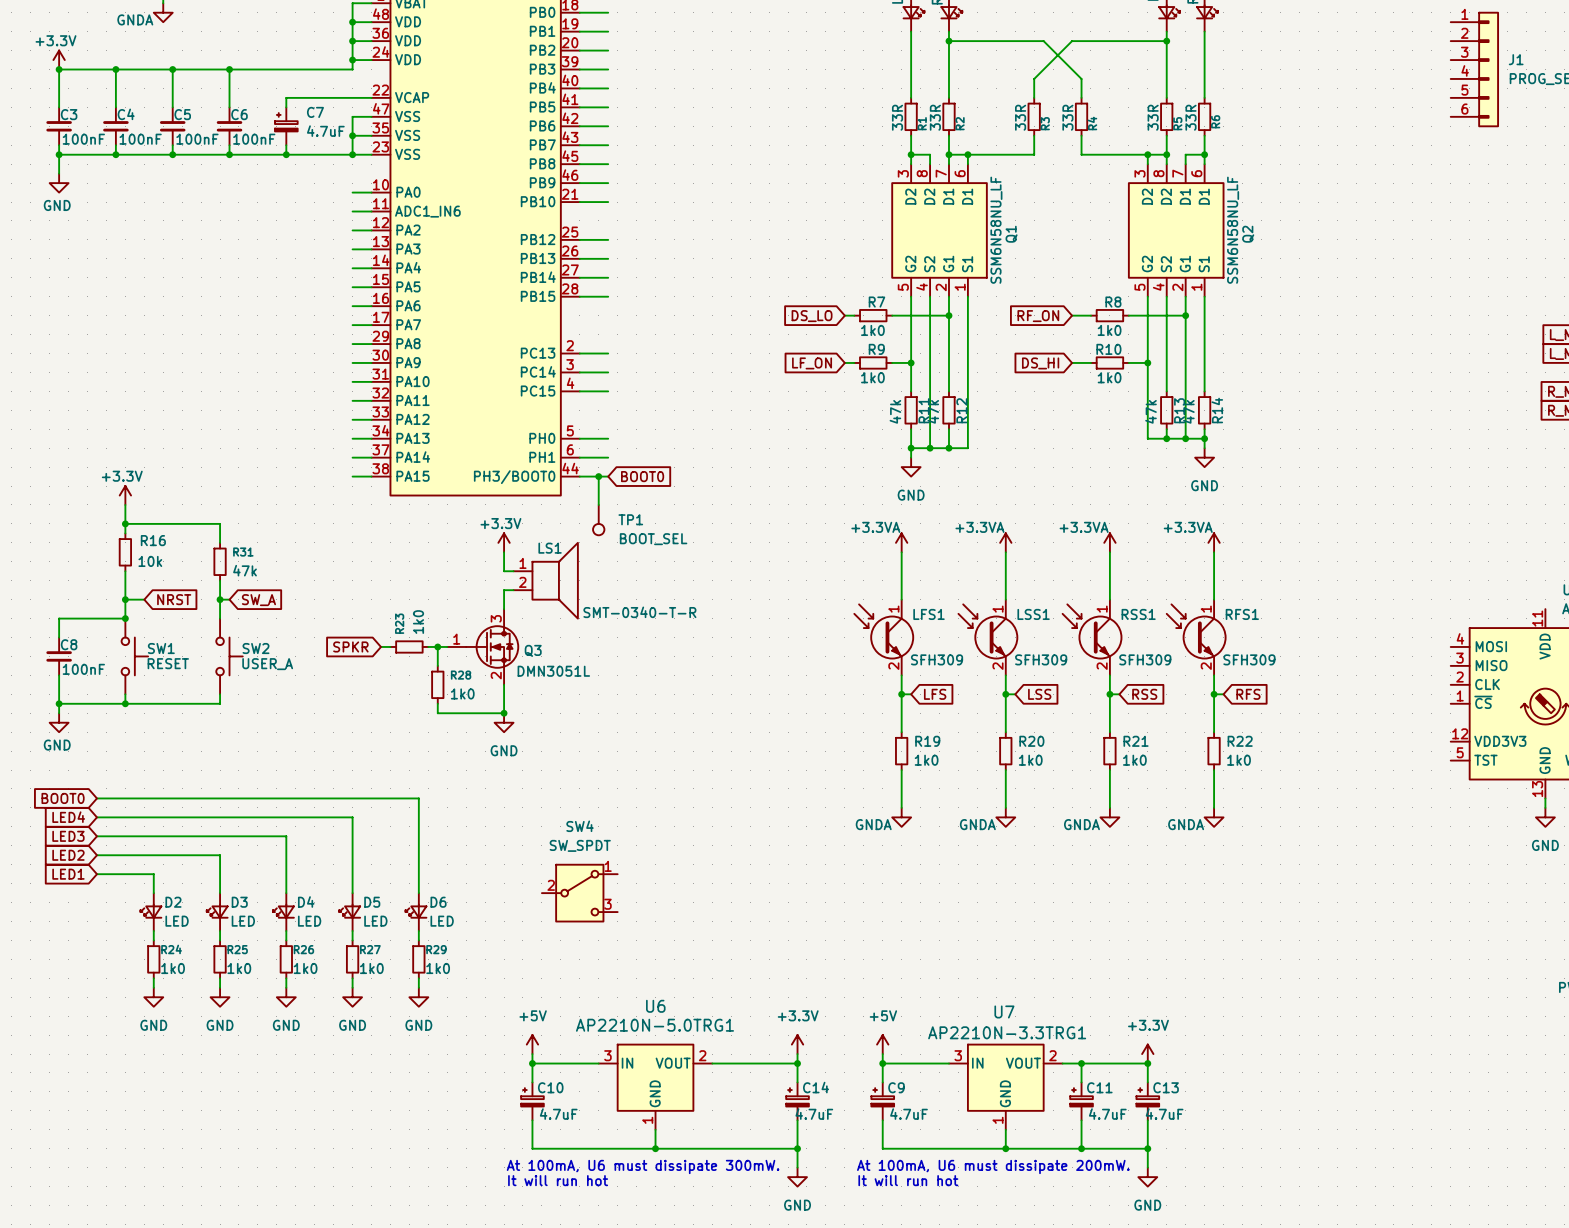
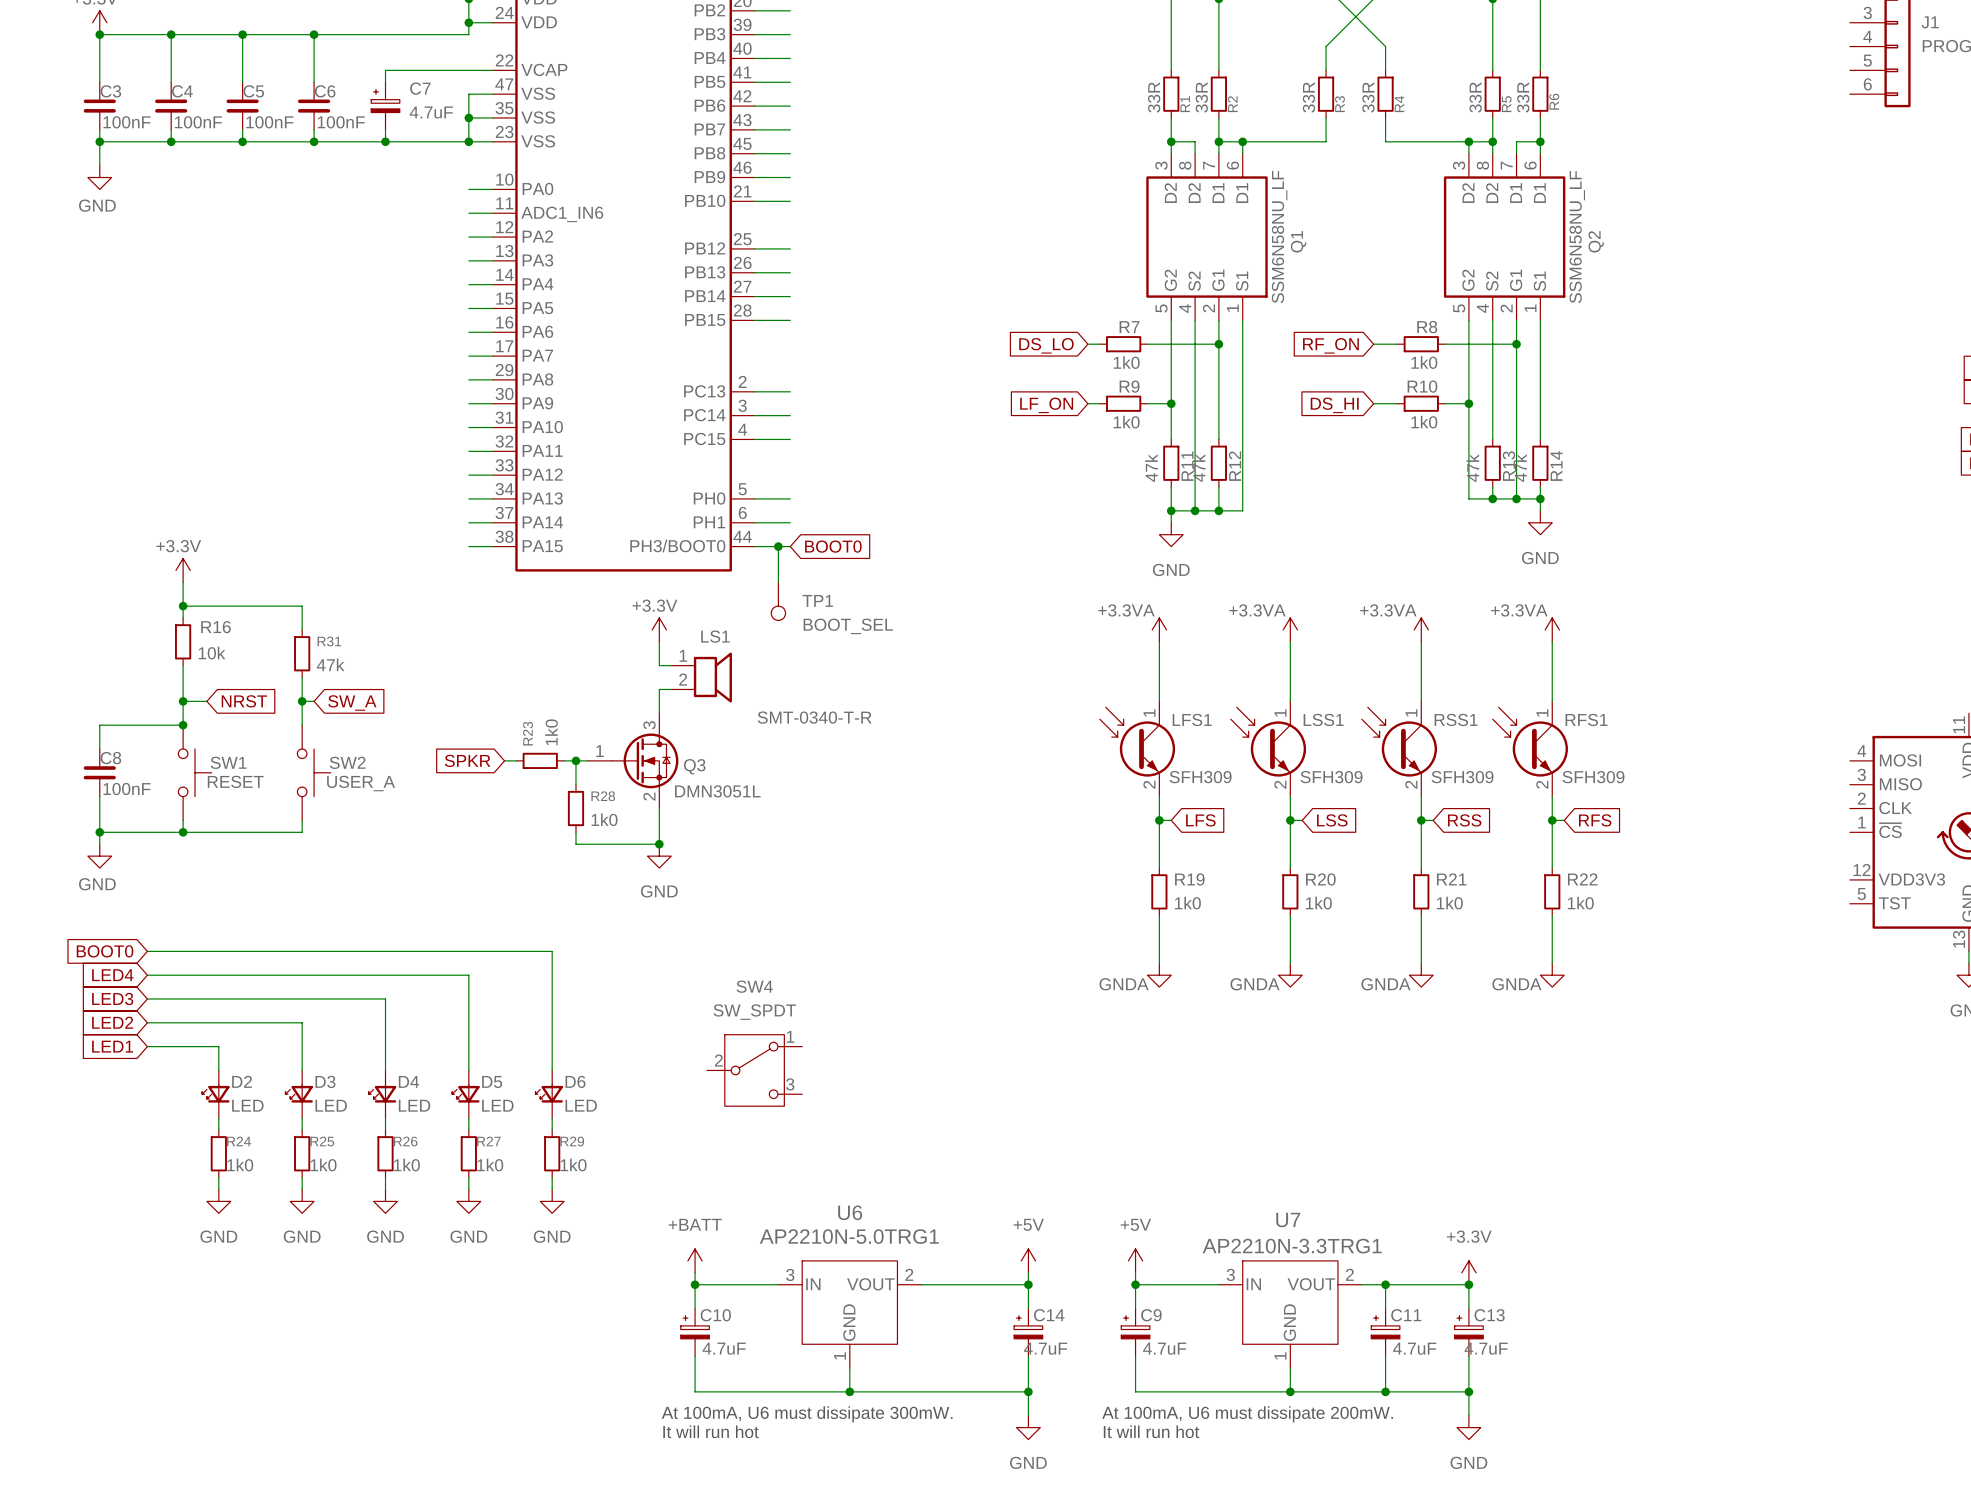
LS1 symbol: [513, 541, 579, 620] -> [671, 652, 732, 703]
power symbol: +5V (532, 1044) -> +BATT (695, 1260)
power symbol: +3.3V (797, 1044) -> +5V (1028, 1260)

